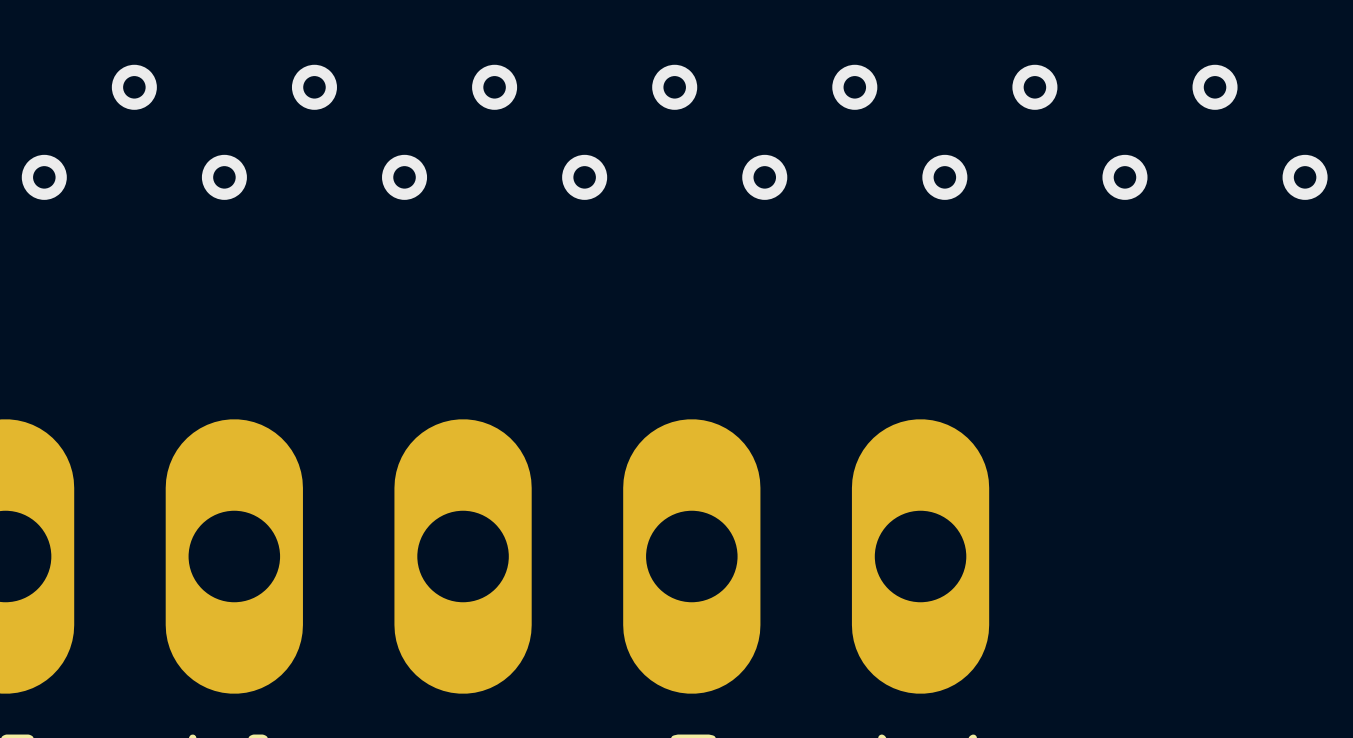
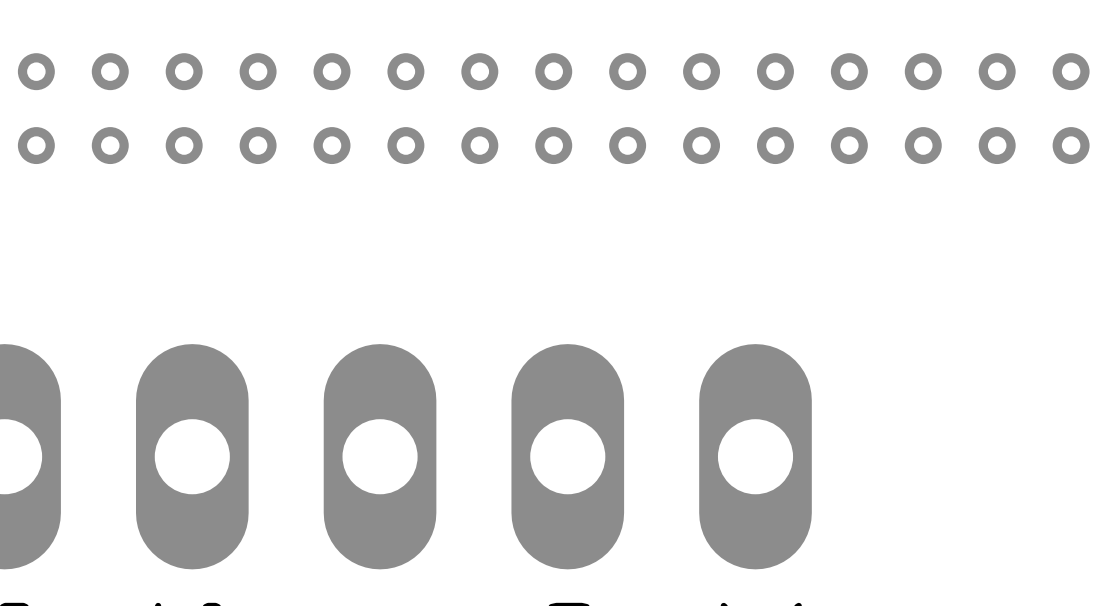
via: none -> (36, 71)
via: none -> (184, 71)
via: none -> (332, 71)
via: none -> (479, 71)
via: none -> (627, 71)
via: none -> (775, 71)
via: none -> (923, 71)
via: none -> (1071, 71)
via: none -> (110, 145)
via: none -> (258, 145)
via: none -> (405, 145)
via: none -> (553, 145)
via: none -> (701, 145)
via: none -> (849, 145)
via: none -> (997, 145)

